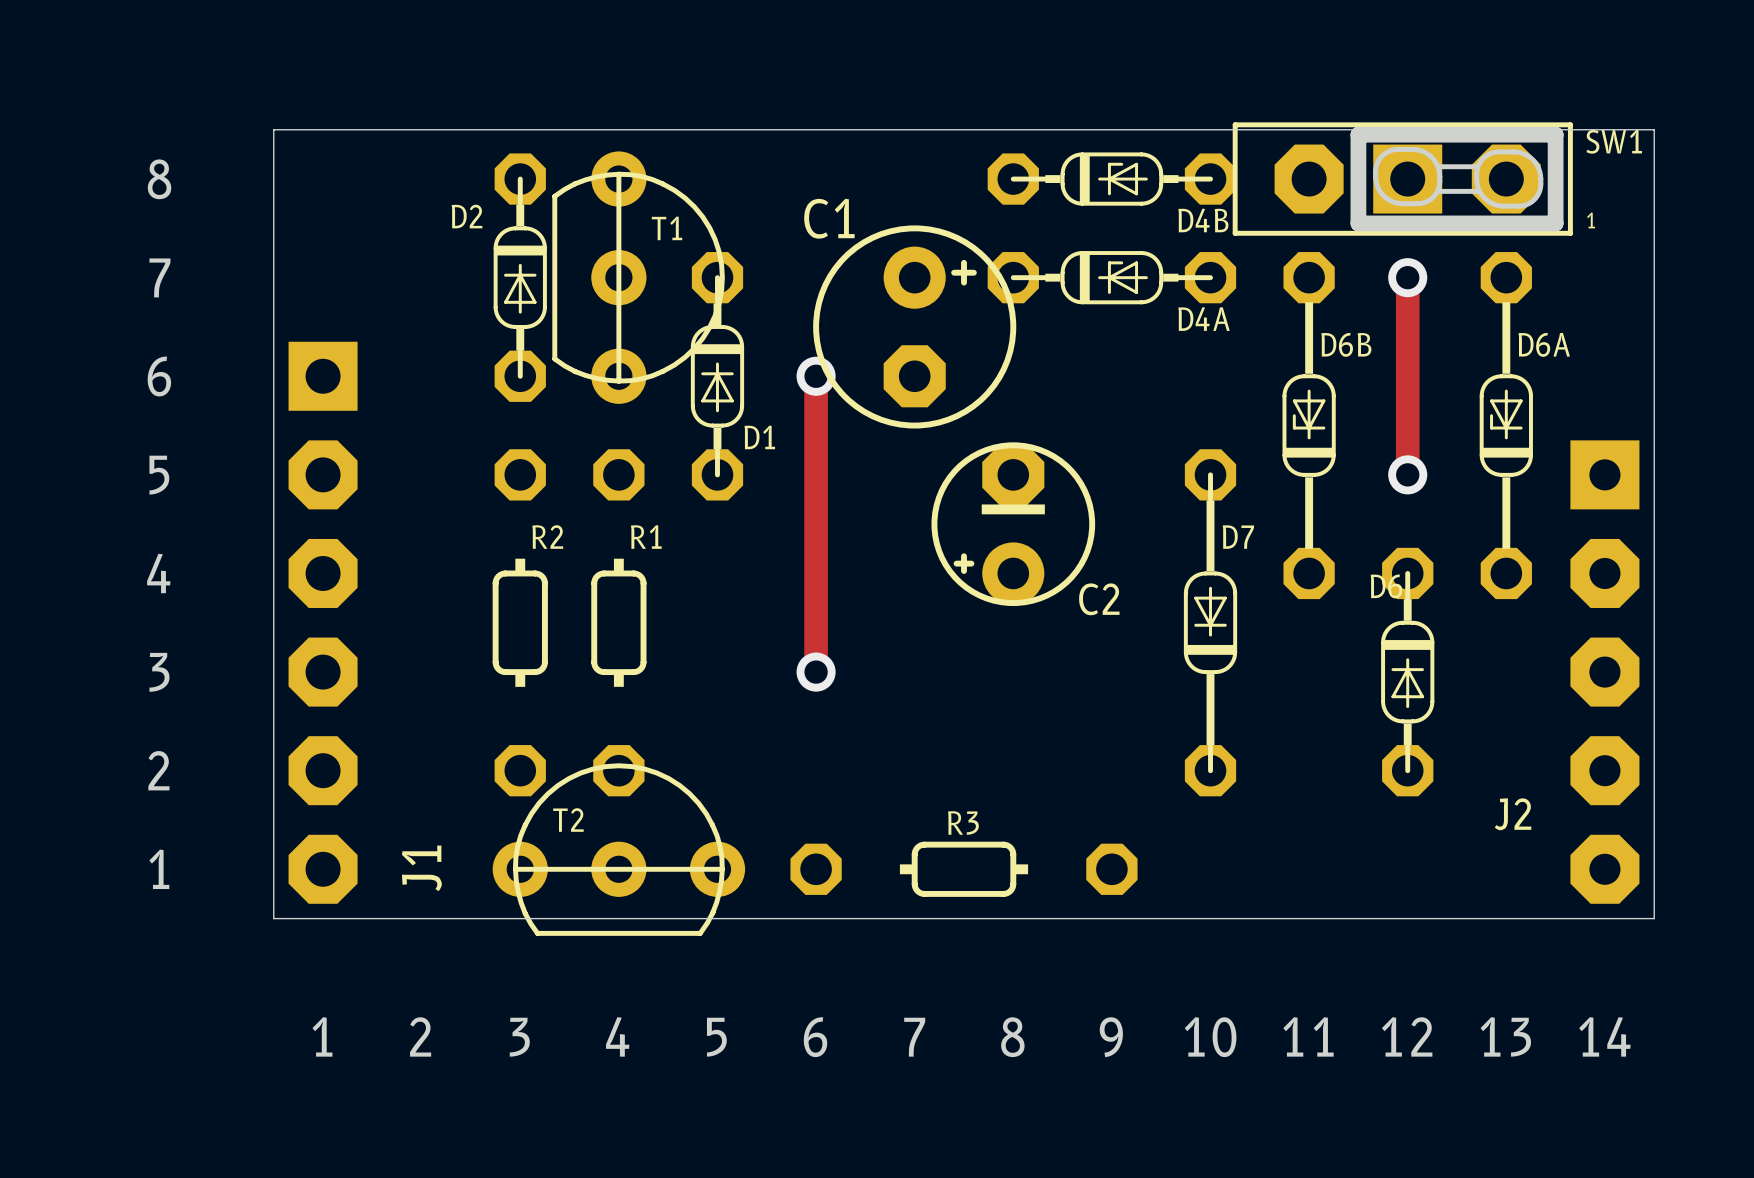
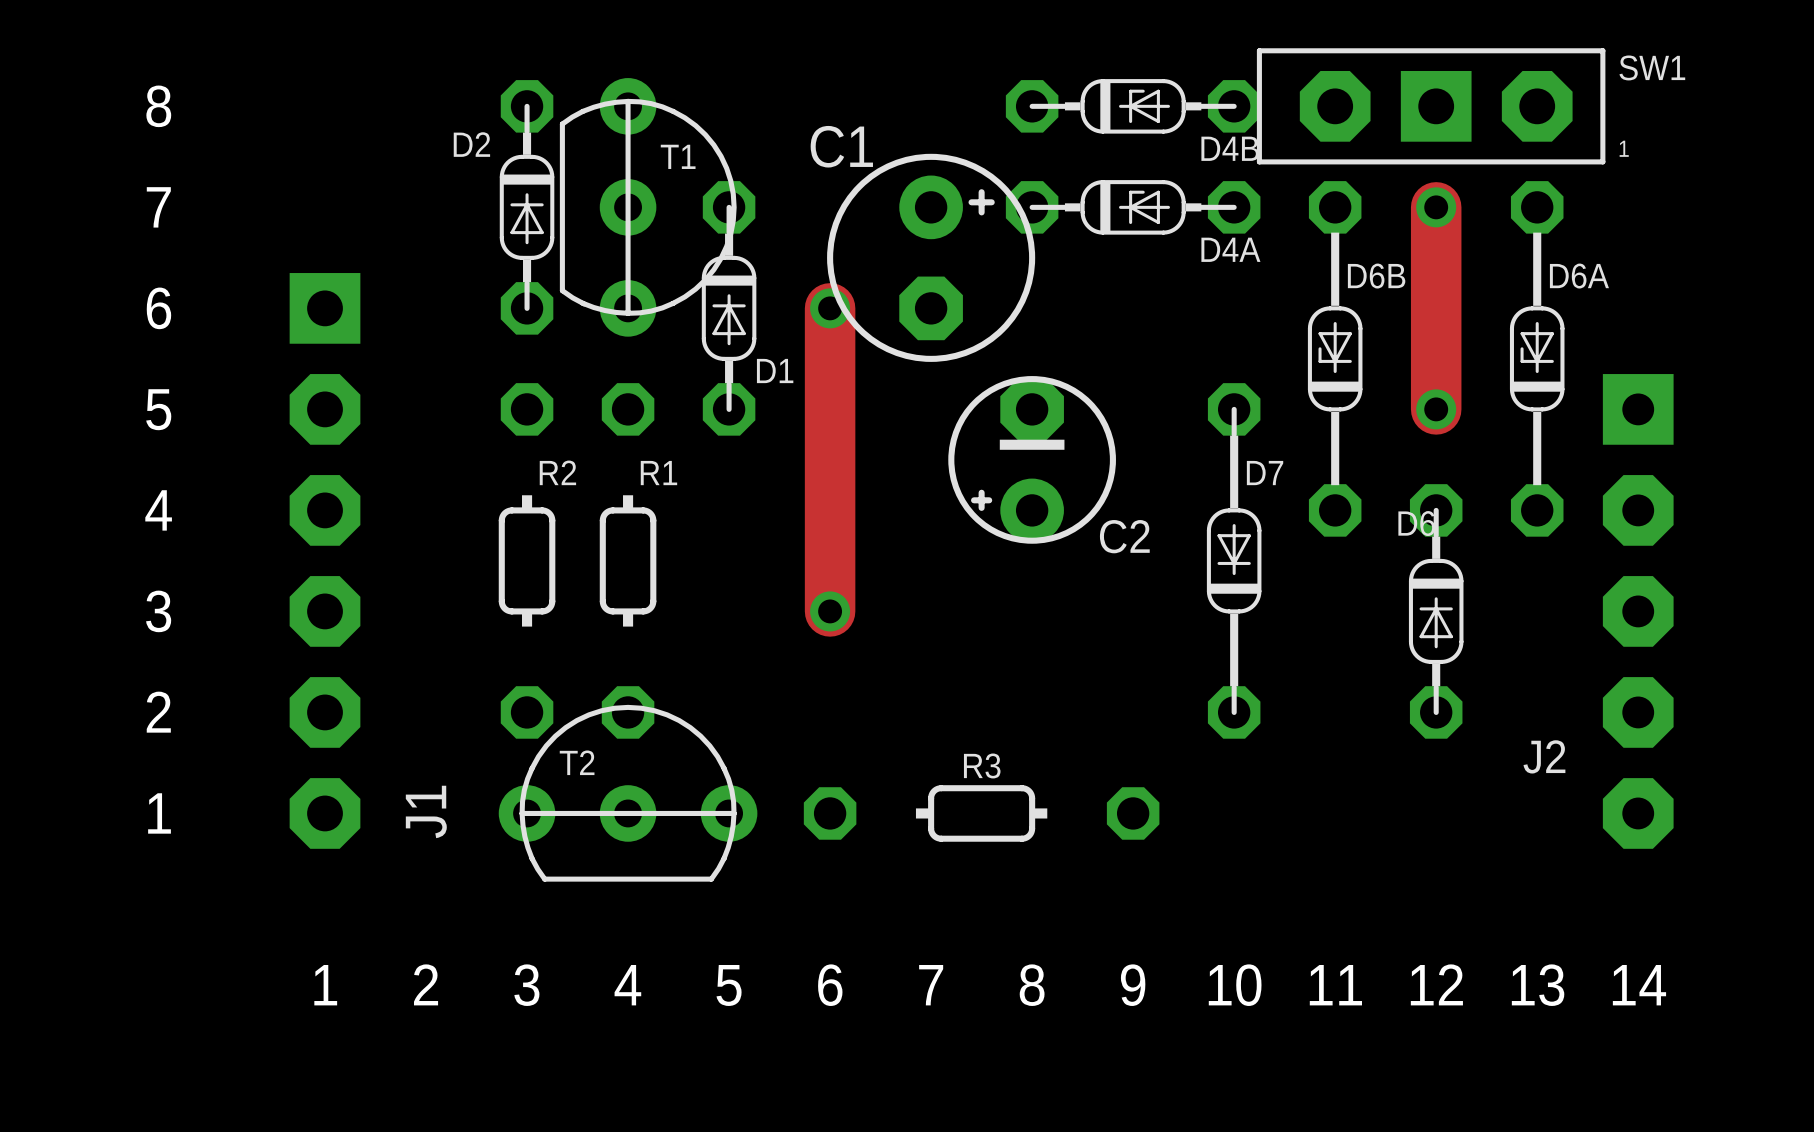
SW1 footprint: [1232, 122, 1573, 236] -> [1256, 48, 1606, 165]
board edge: (273, 129) (1654, 129) (1654, 918) (273, 918) (273, 129) -> none
track width: thin (1407, 277) (1407, 474) -> thick (1436, 207) (1436, 409)
track width: thin (816, 376) (816, 672) -> thick (830, 308) (830, 611)

